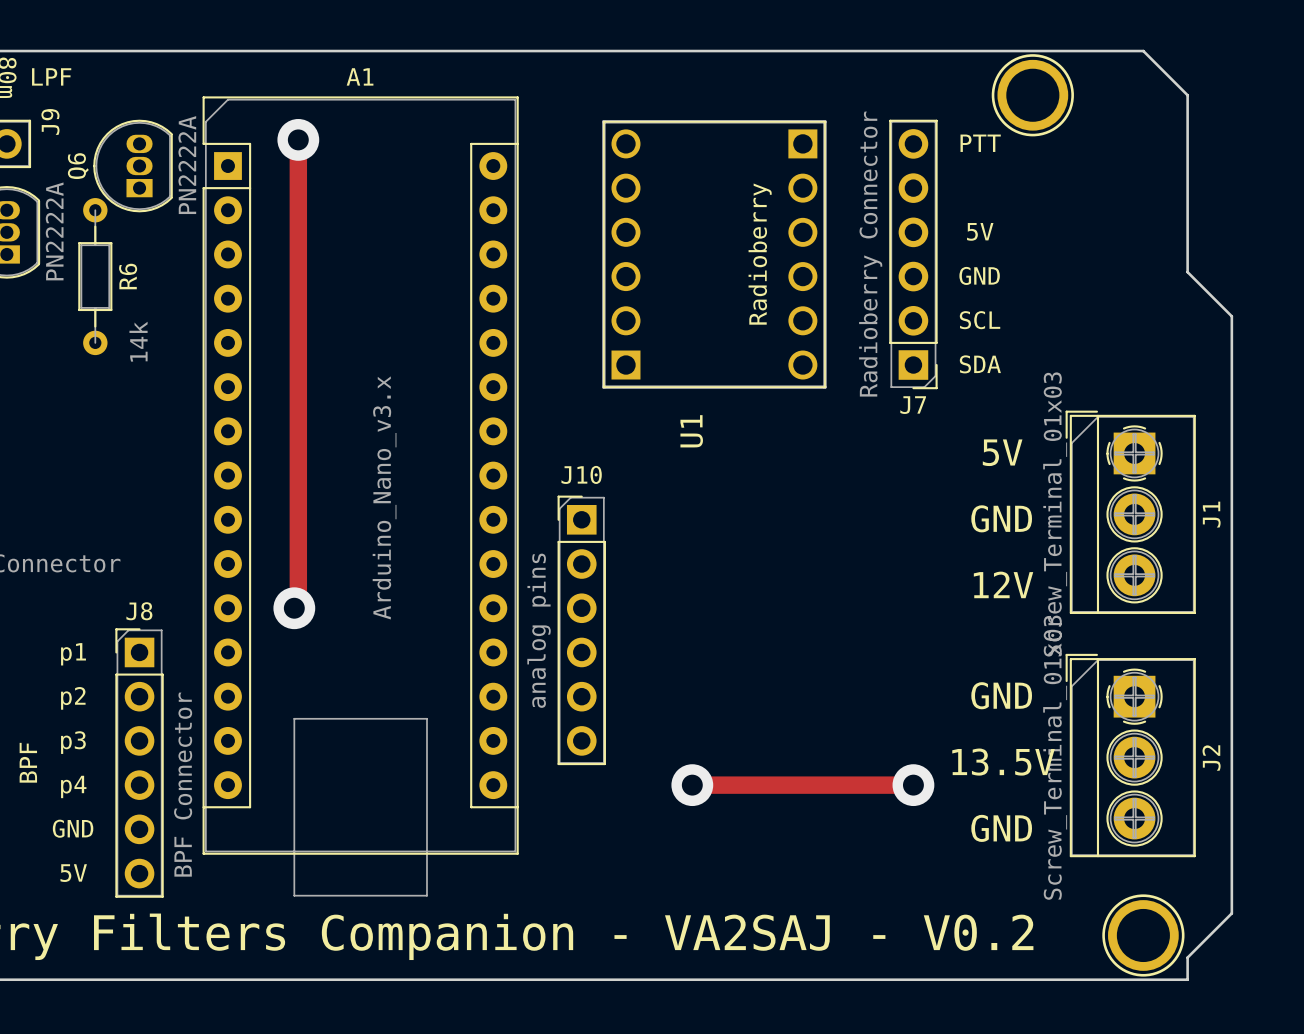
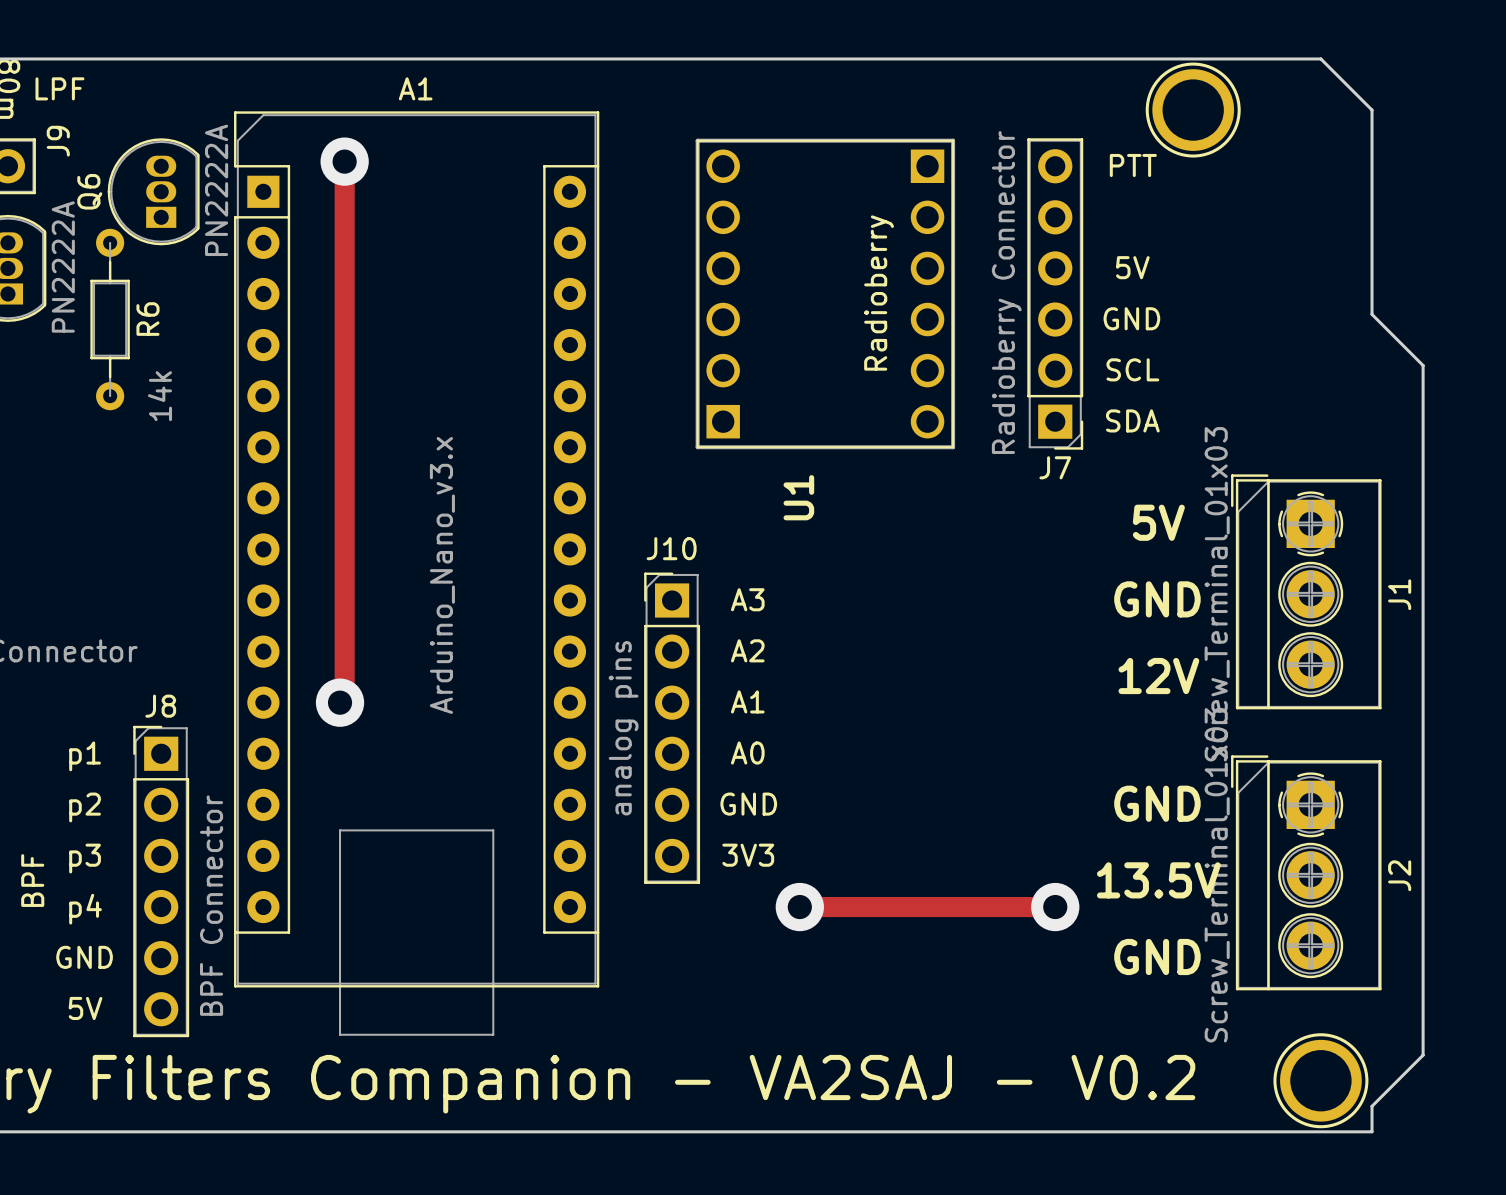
text: none -> A3 (747, 599)
text: none -> A2 (747, 650)
text: none -> A1 (747, 701)
text: none -> A0 (747, 753)
text: none -> GND (748, 804)
text: none -> 3V3 (748, 855)

